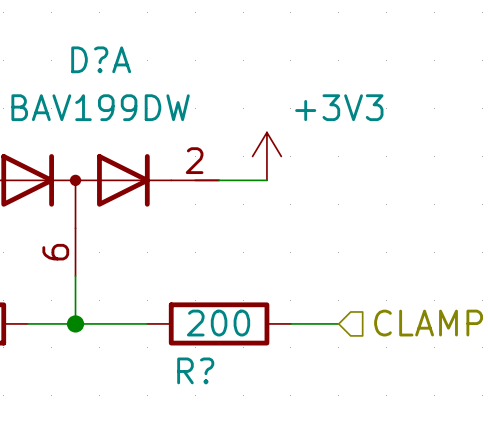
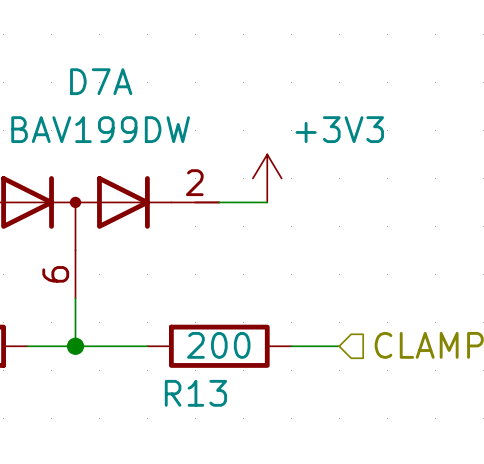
D?A name: D?A (101, 59) -> D7A (101, 81)
R? name: R? (195, 370) -> R13 (195, 393)

